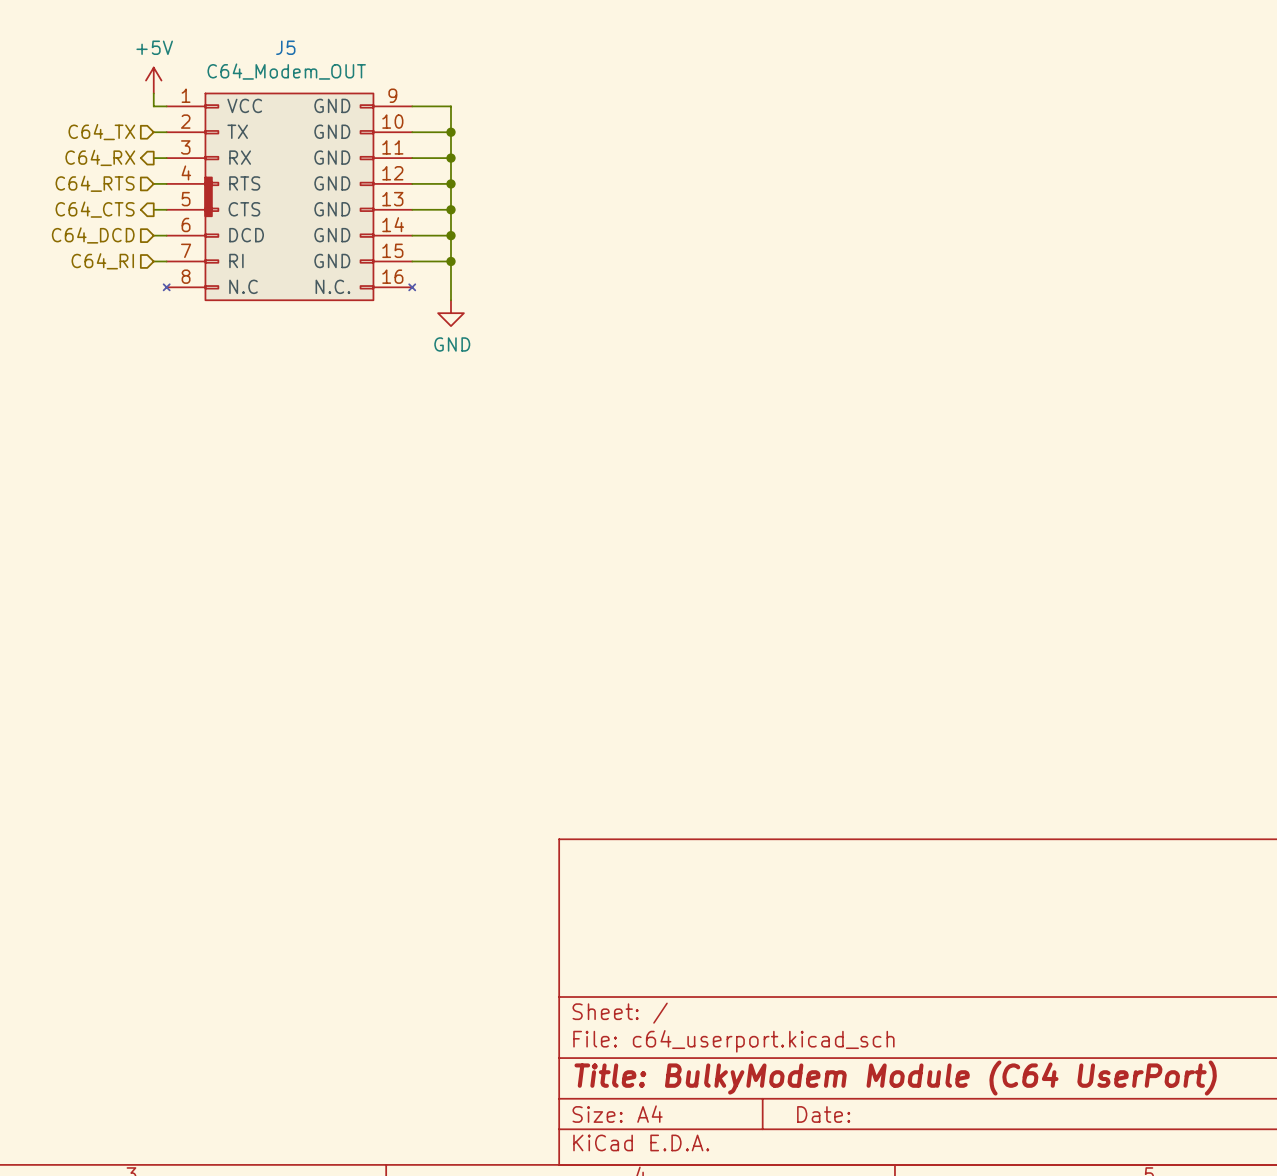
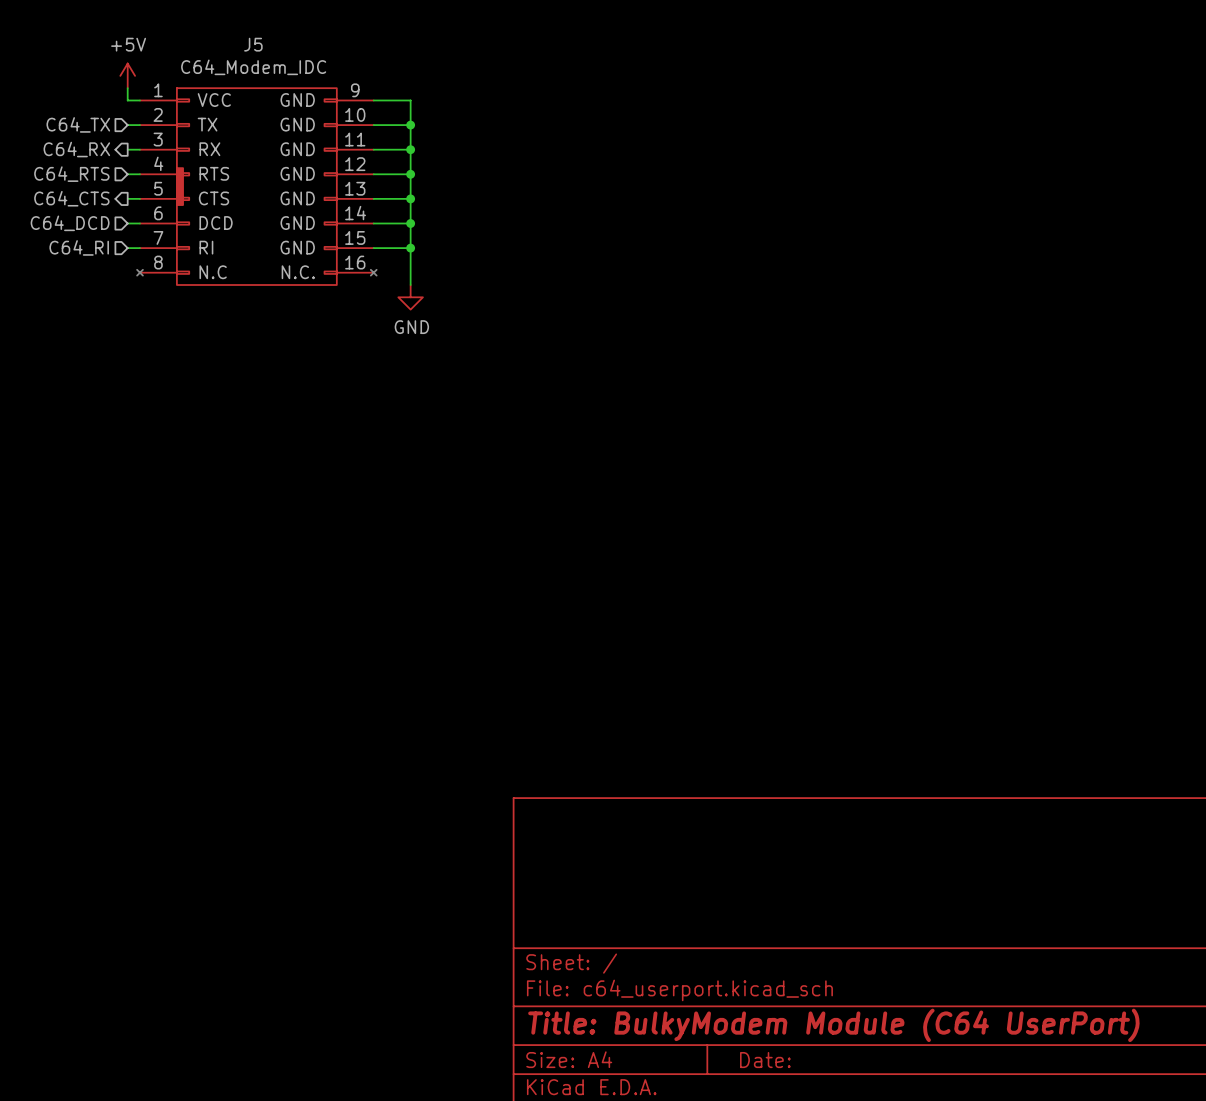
J5 value: C64_Modem_OUT (286, 71) -> C64_Modem_IDC (253, 67)

